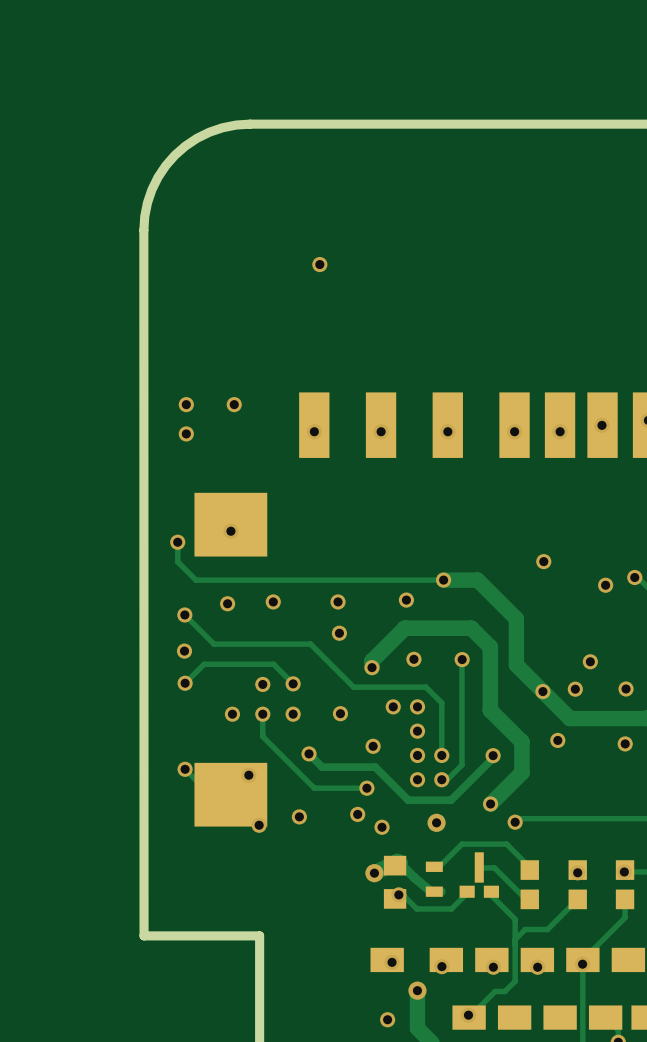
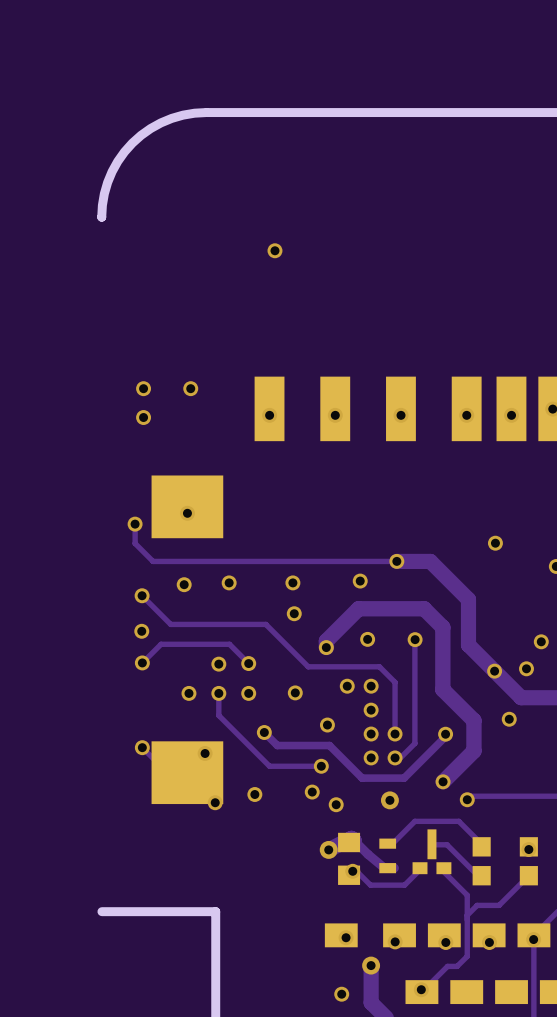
board edge: (250, 124) (222, 127) (209, 132) (185, 146) (174, 155) (158, 177) (147, 202) (144, 216) (144, 935) -> (206, 112) (183, 115) (160, 122) (132, 143) (112, 171) (104, 193) (101, 217)

